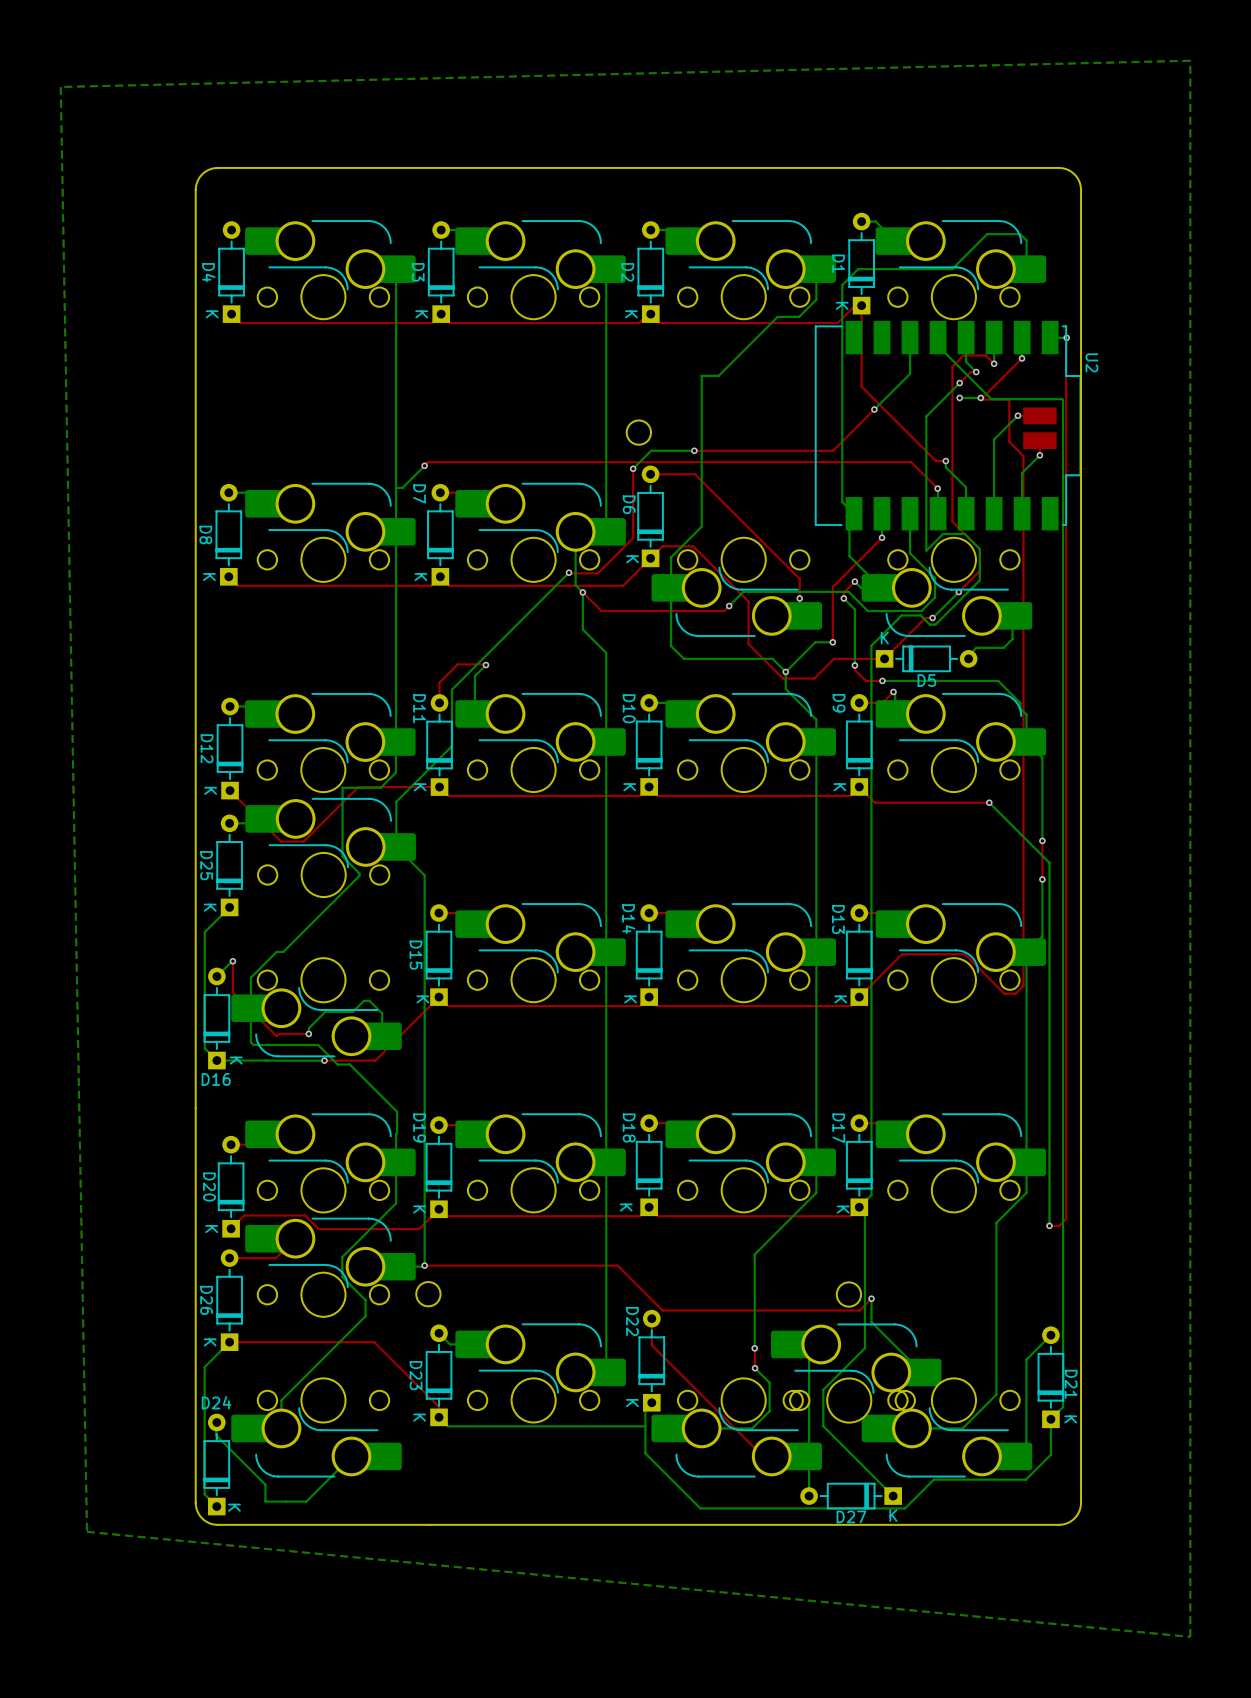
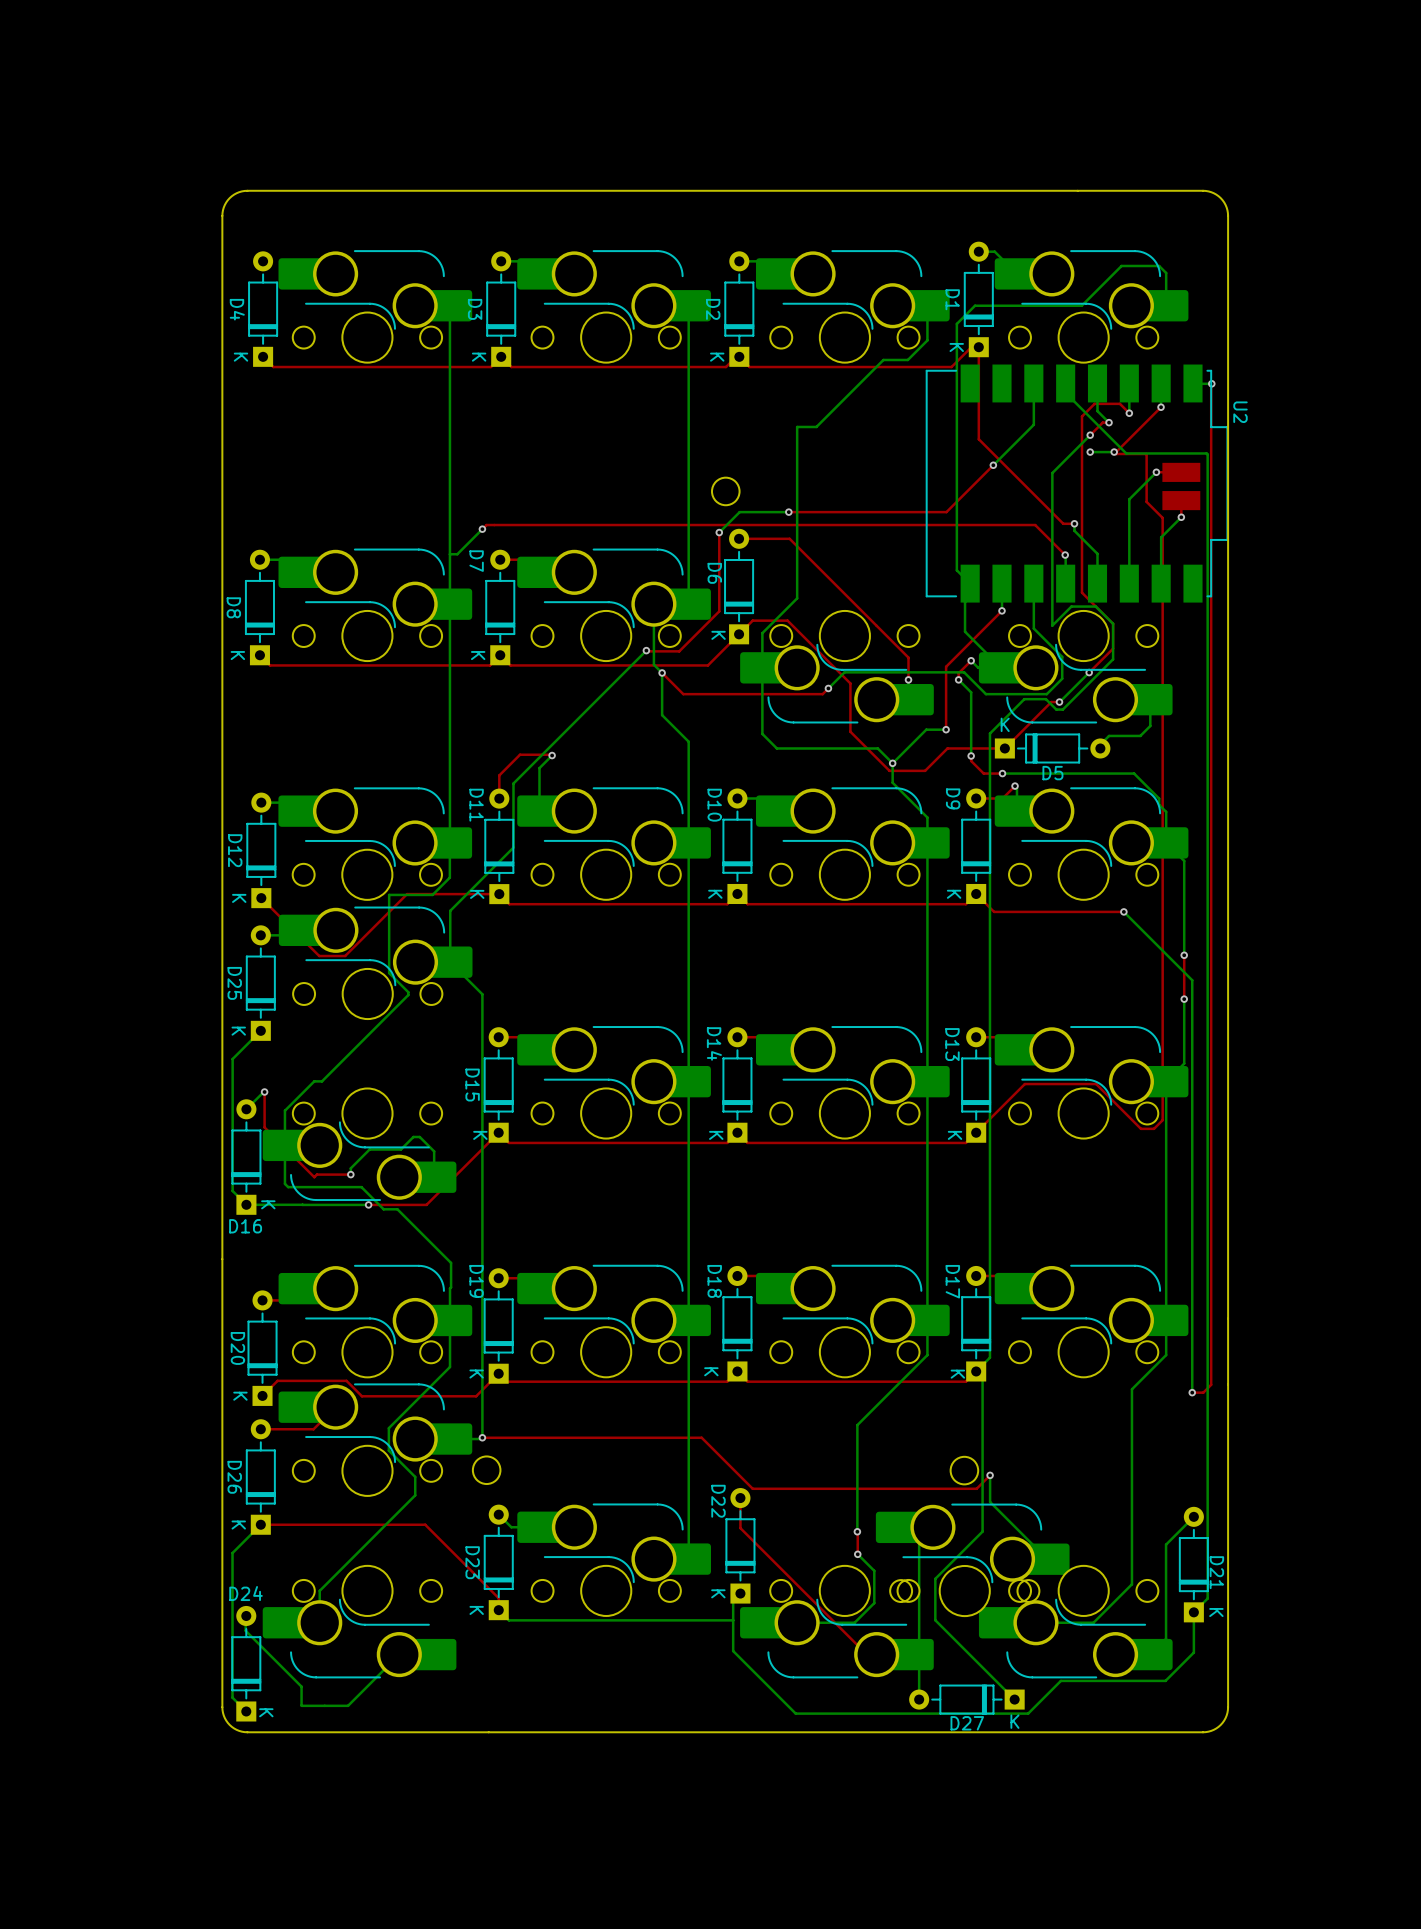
bottom zone outline: (1190, 60) (60, 87) (87, 1531) (1190, 1636) (1190, 60) -> none

